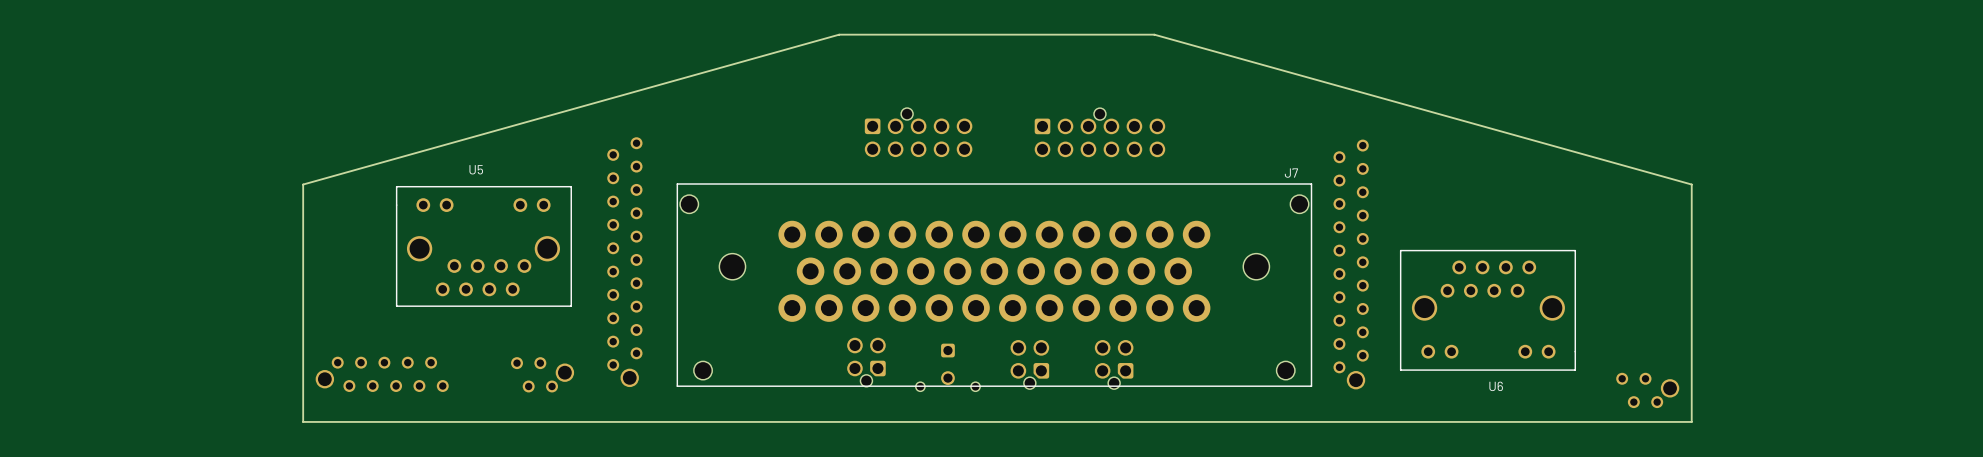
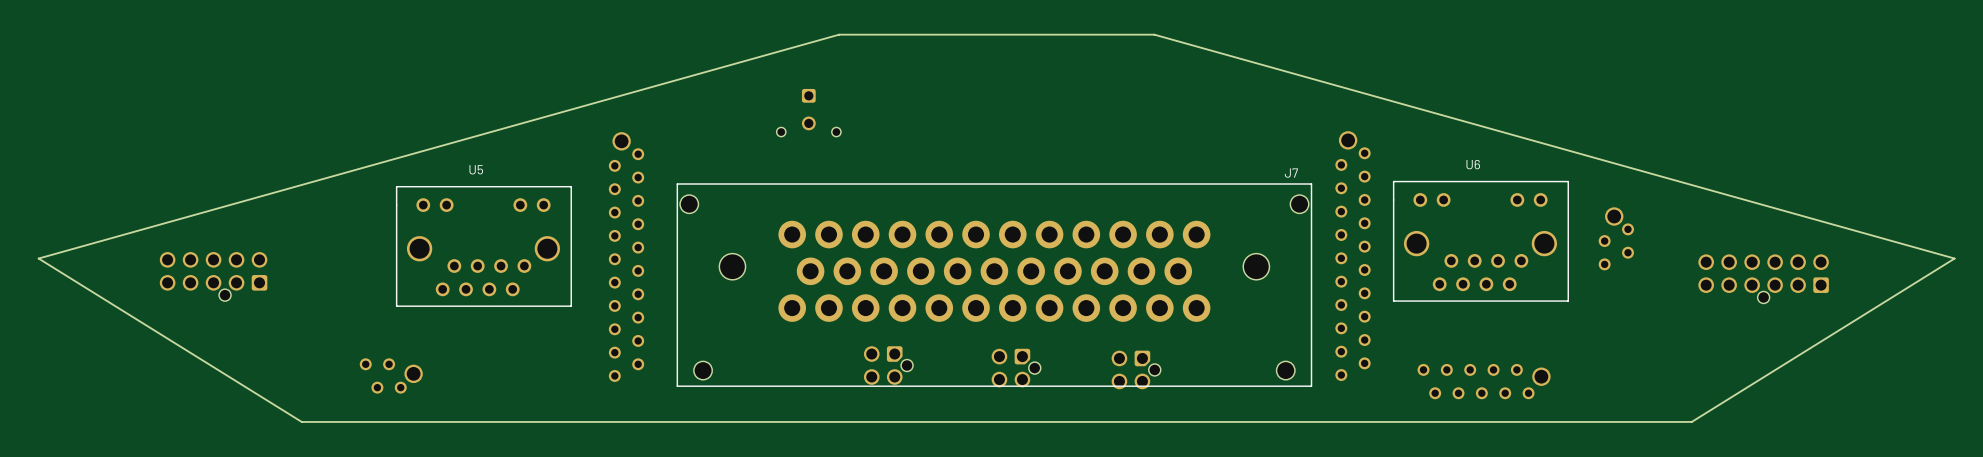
board edge: (839, 34) (303, 184) (303, 421) -> (839, 34) (38, 258) (303, 421)
board edge: (1154, 34) (1691, 184) (1691, 421) -> (1154, 34) (1954, 258) (1691, 421)
part: none -> (808, 112)
part: (918, 132) -> none
part: (1099, 132) -> none
part rotation: 0° (624, 262) -> 180° (626, 257)
part rotation: 0° (1351, 264) -> 180° (1353, 256)
part: none -> (213, 276)
part: none -> (1763, 278)
U6 rotation: 0° (1487, 310) -> 180° (1480, 241)
part rotation: 0° (866, 362) -> 90° counterclockwise (888, 365)
part rotation: 0° (1029, 364) -> 90° counterclockwise (1016, 368)
part rotation: 0° (1114, 364) -> 90° counterclockwise (1136, 369)
part: (947, 367) -> none
part: (382, 374) -> none
part position: (542, 374) -> (391, 375)
part: none -> (1484, 381)
part rotation: 0° (1647, 390) -> 90° counterclockwise (1616, 238)
part position: (1647, 390) -> (1616, 238)

